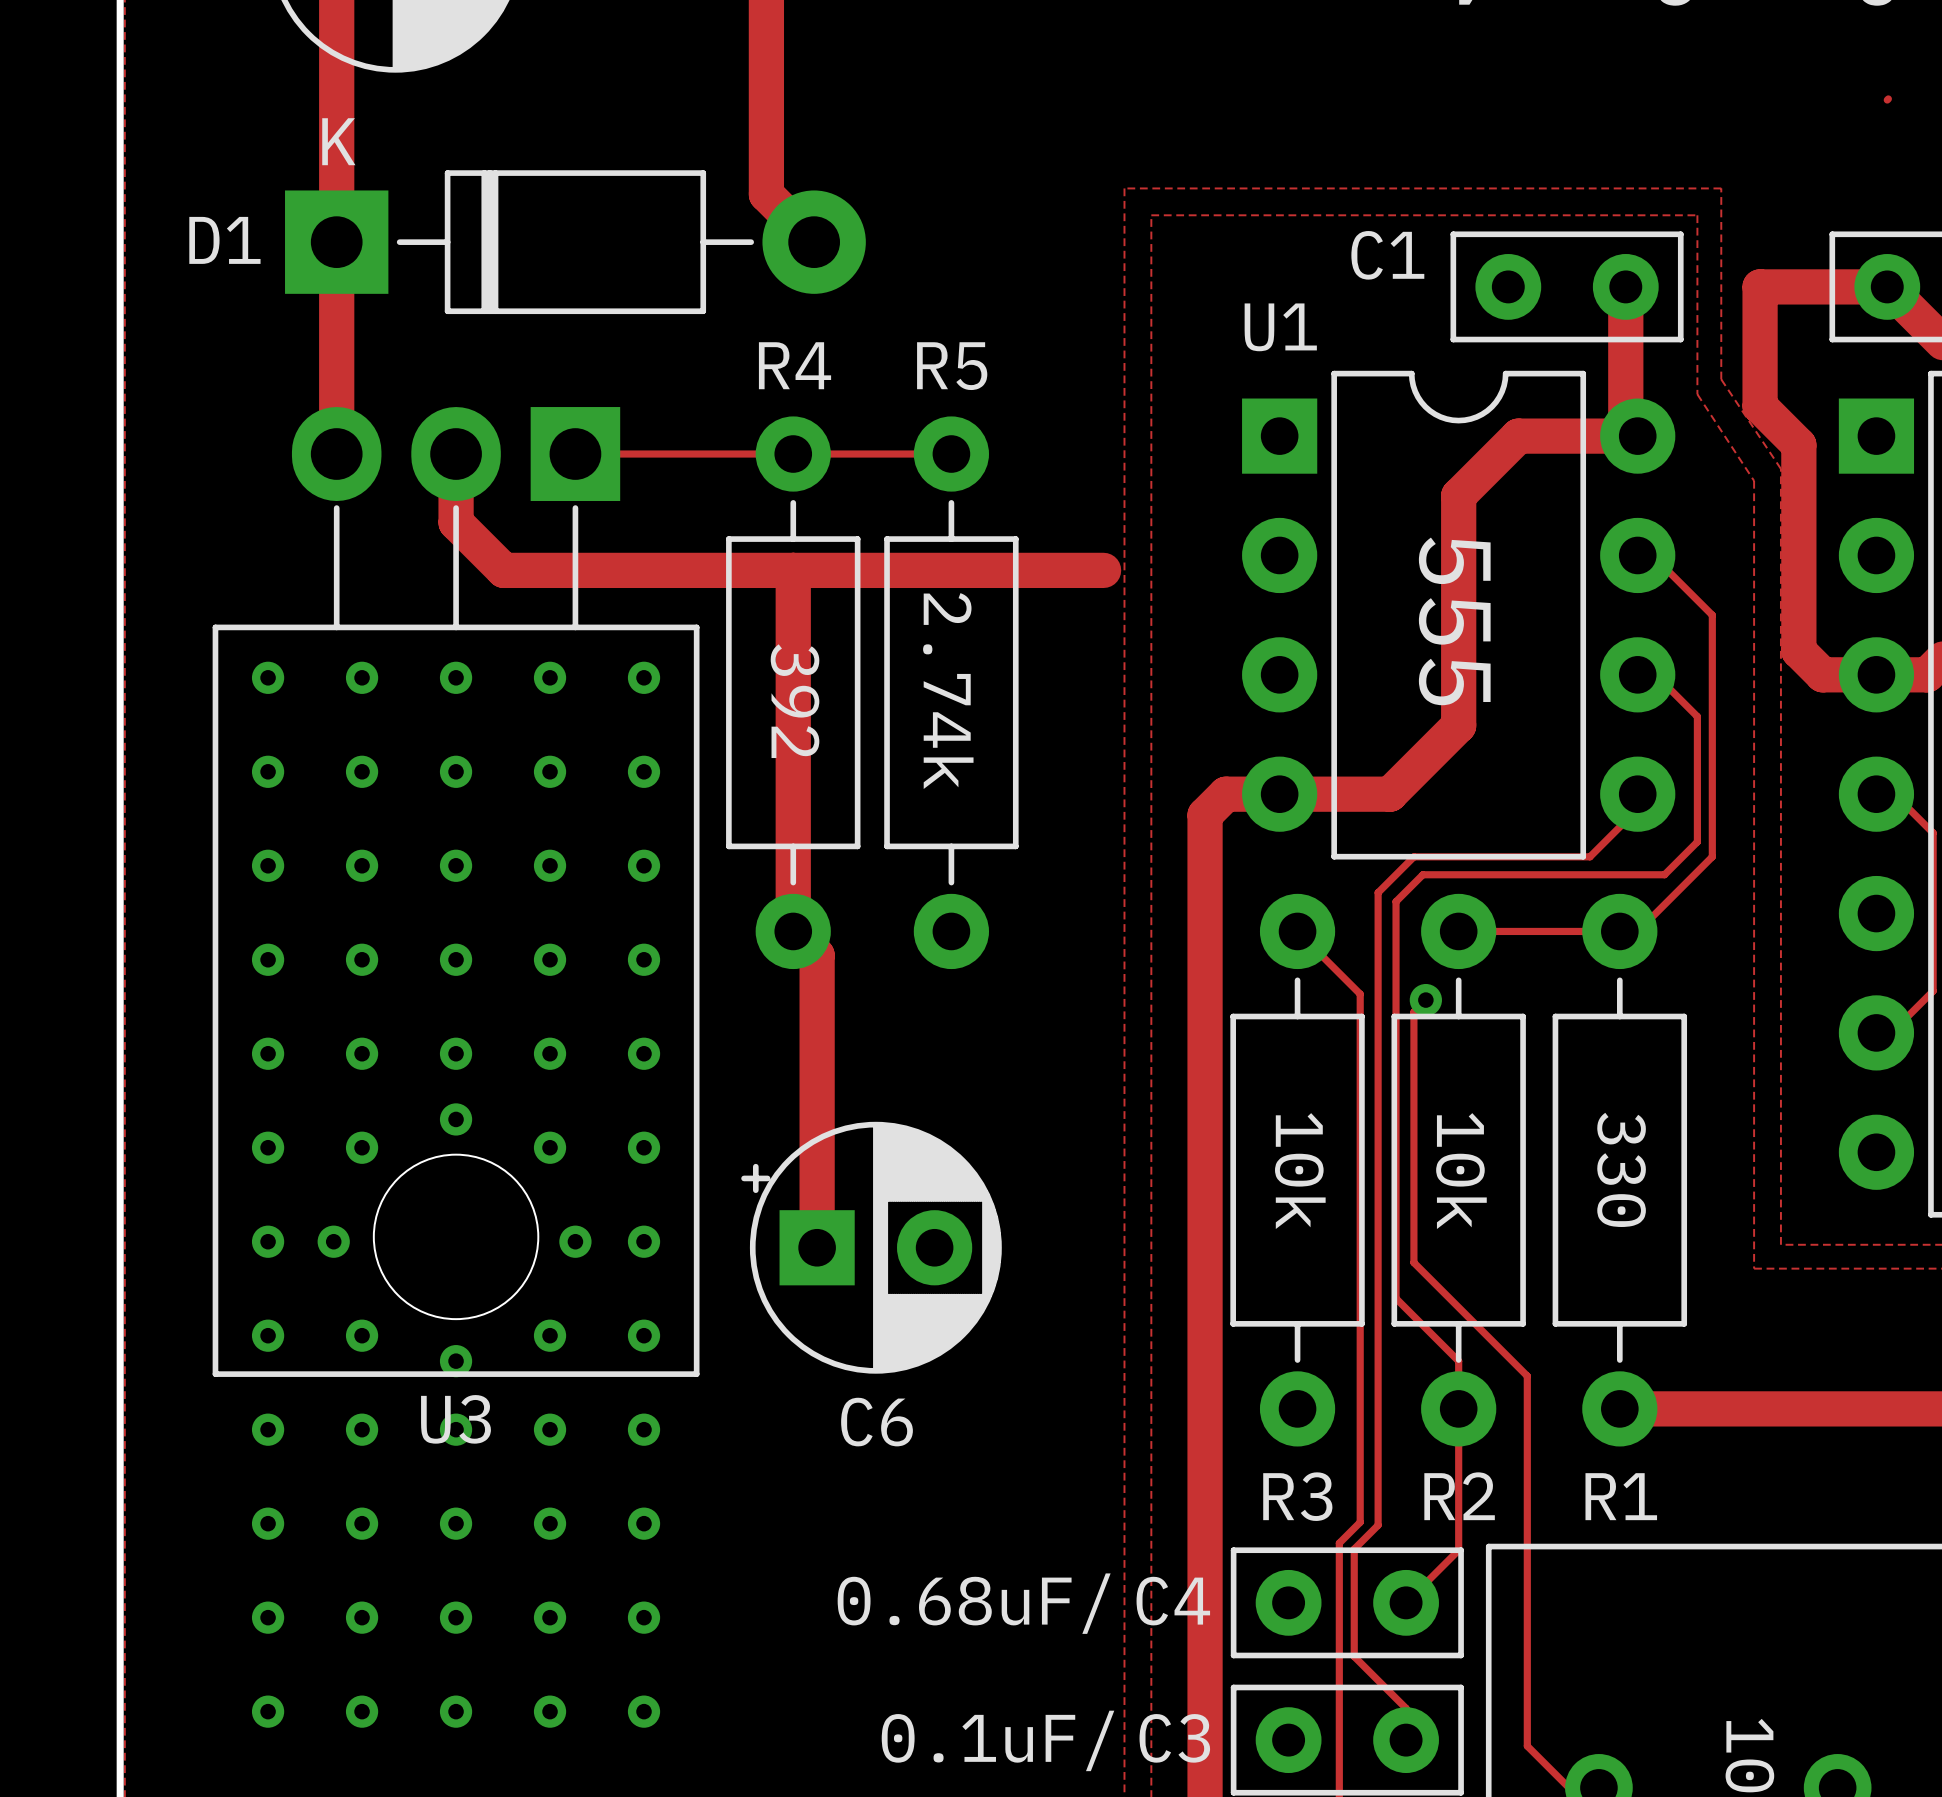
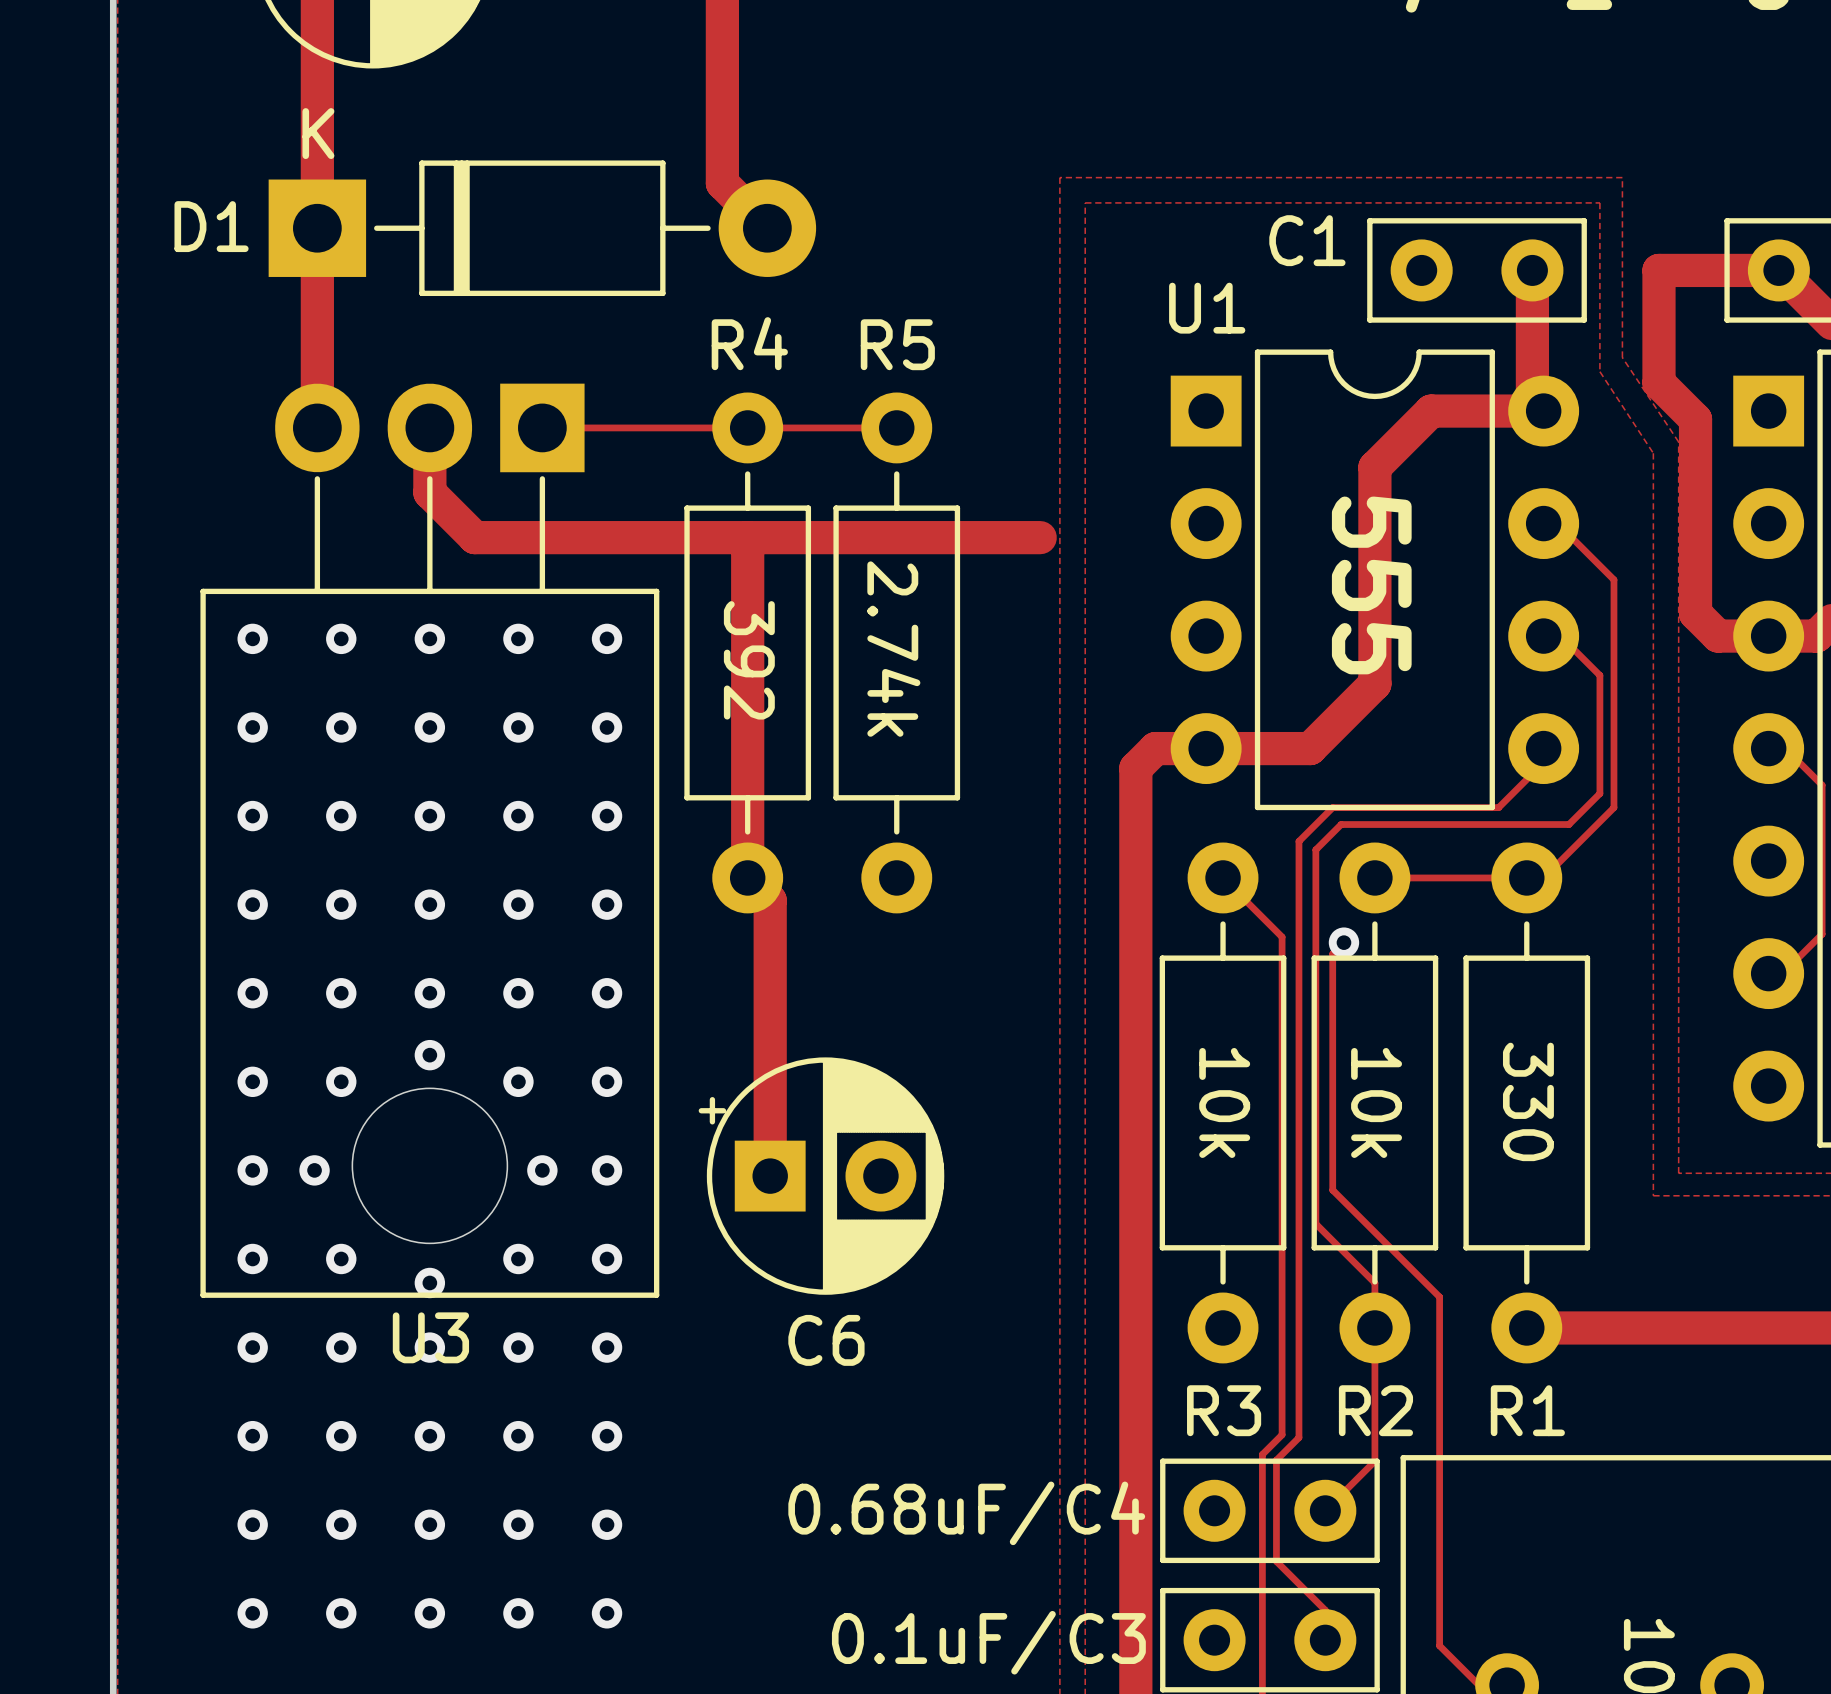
track: (1888, 98) (1887, 100) -> none

